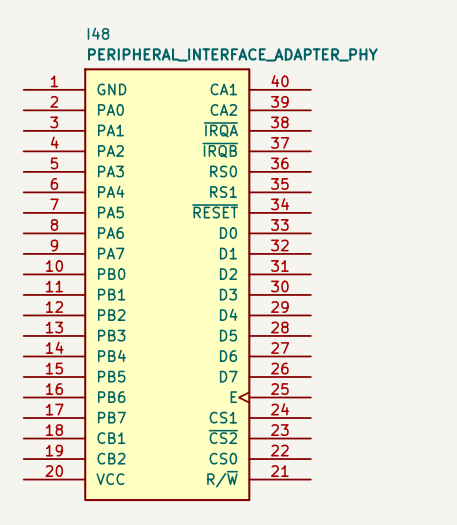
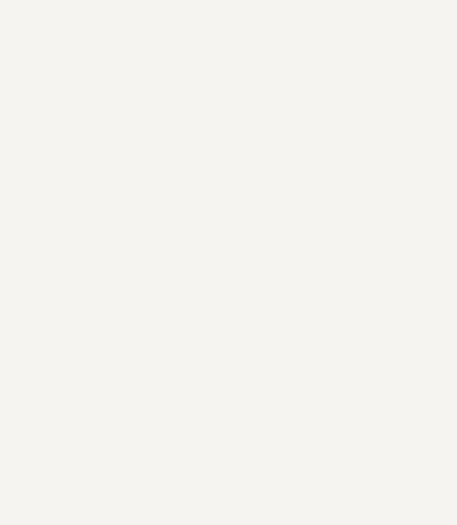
I48: PERIPHERAL_INTERFACE_ADAPTER_PHY (167, 284) -> none

